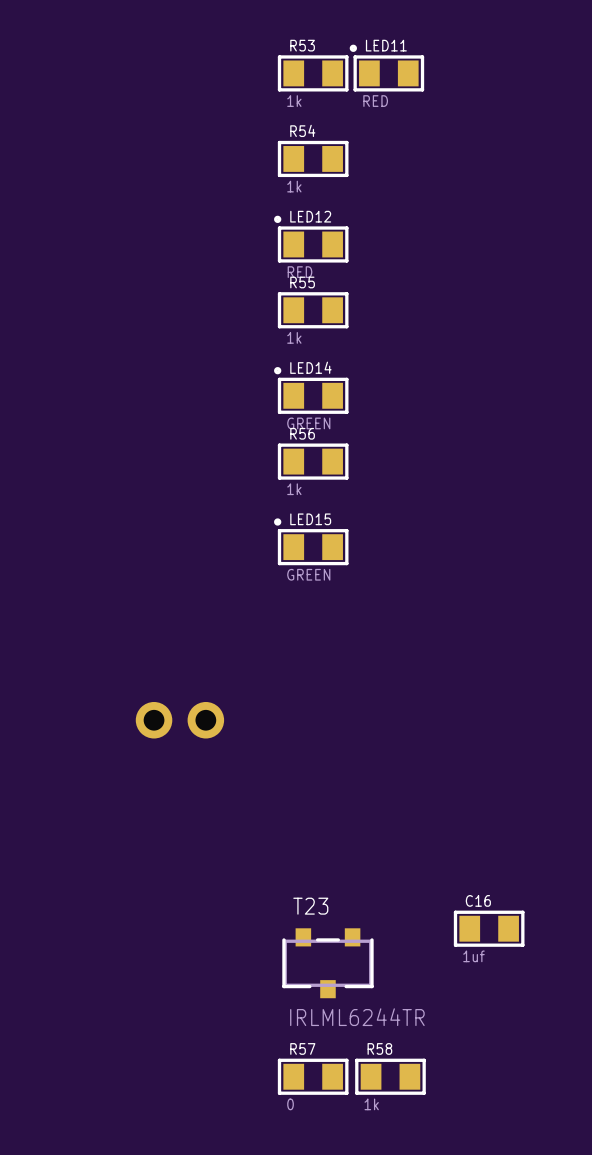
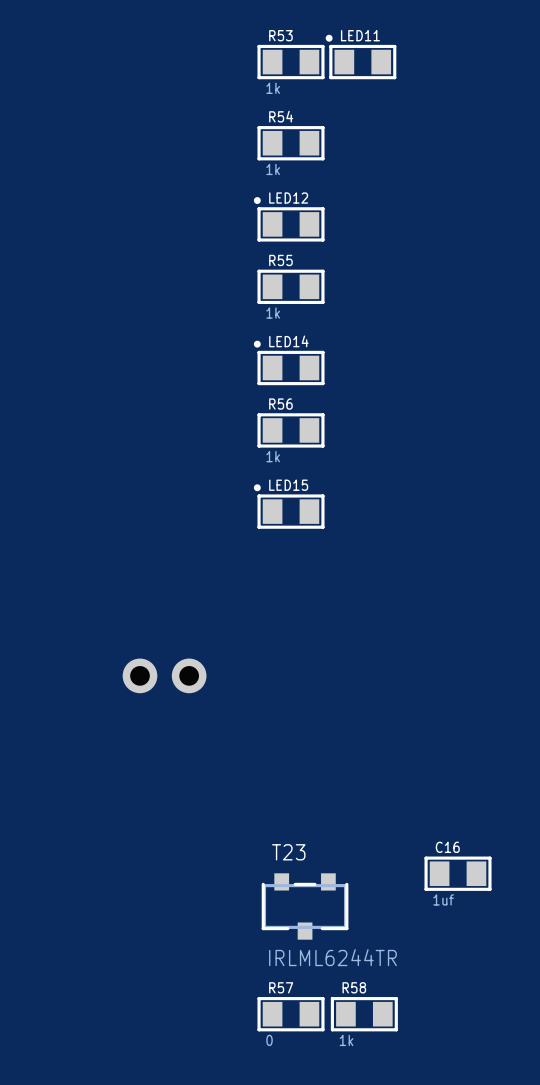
LED11 value: RED (375, 101) -> none
LED12 value: RED (299, 272) -> none
LED14 value: GREEN (308, 423) -> none
LED15 value: GREEN (308, 574) -> none

